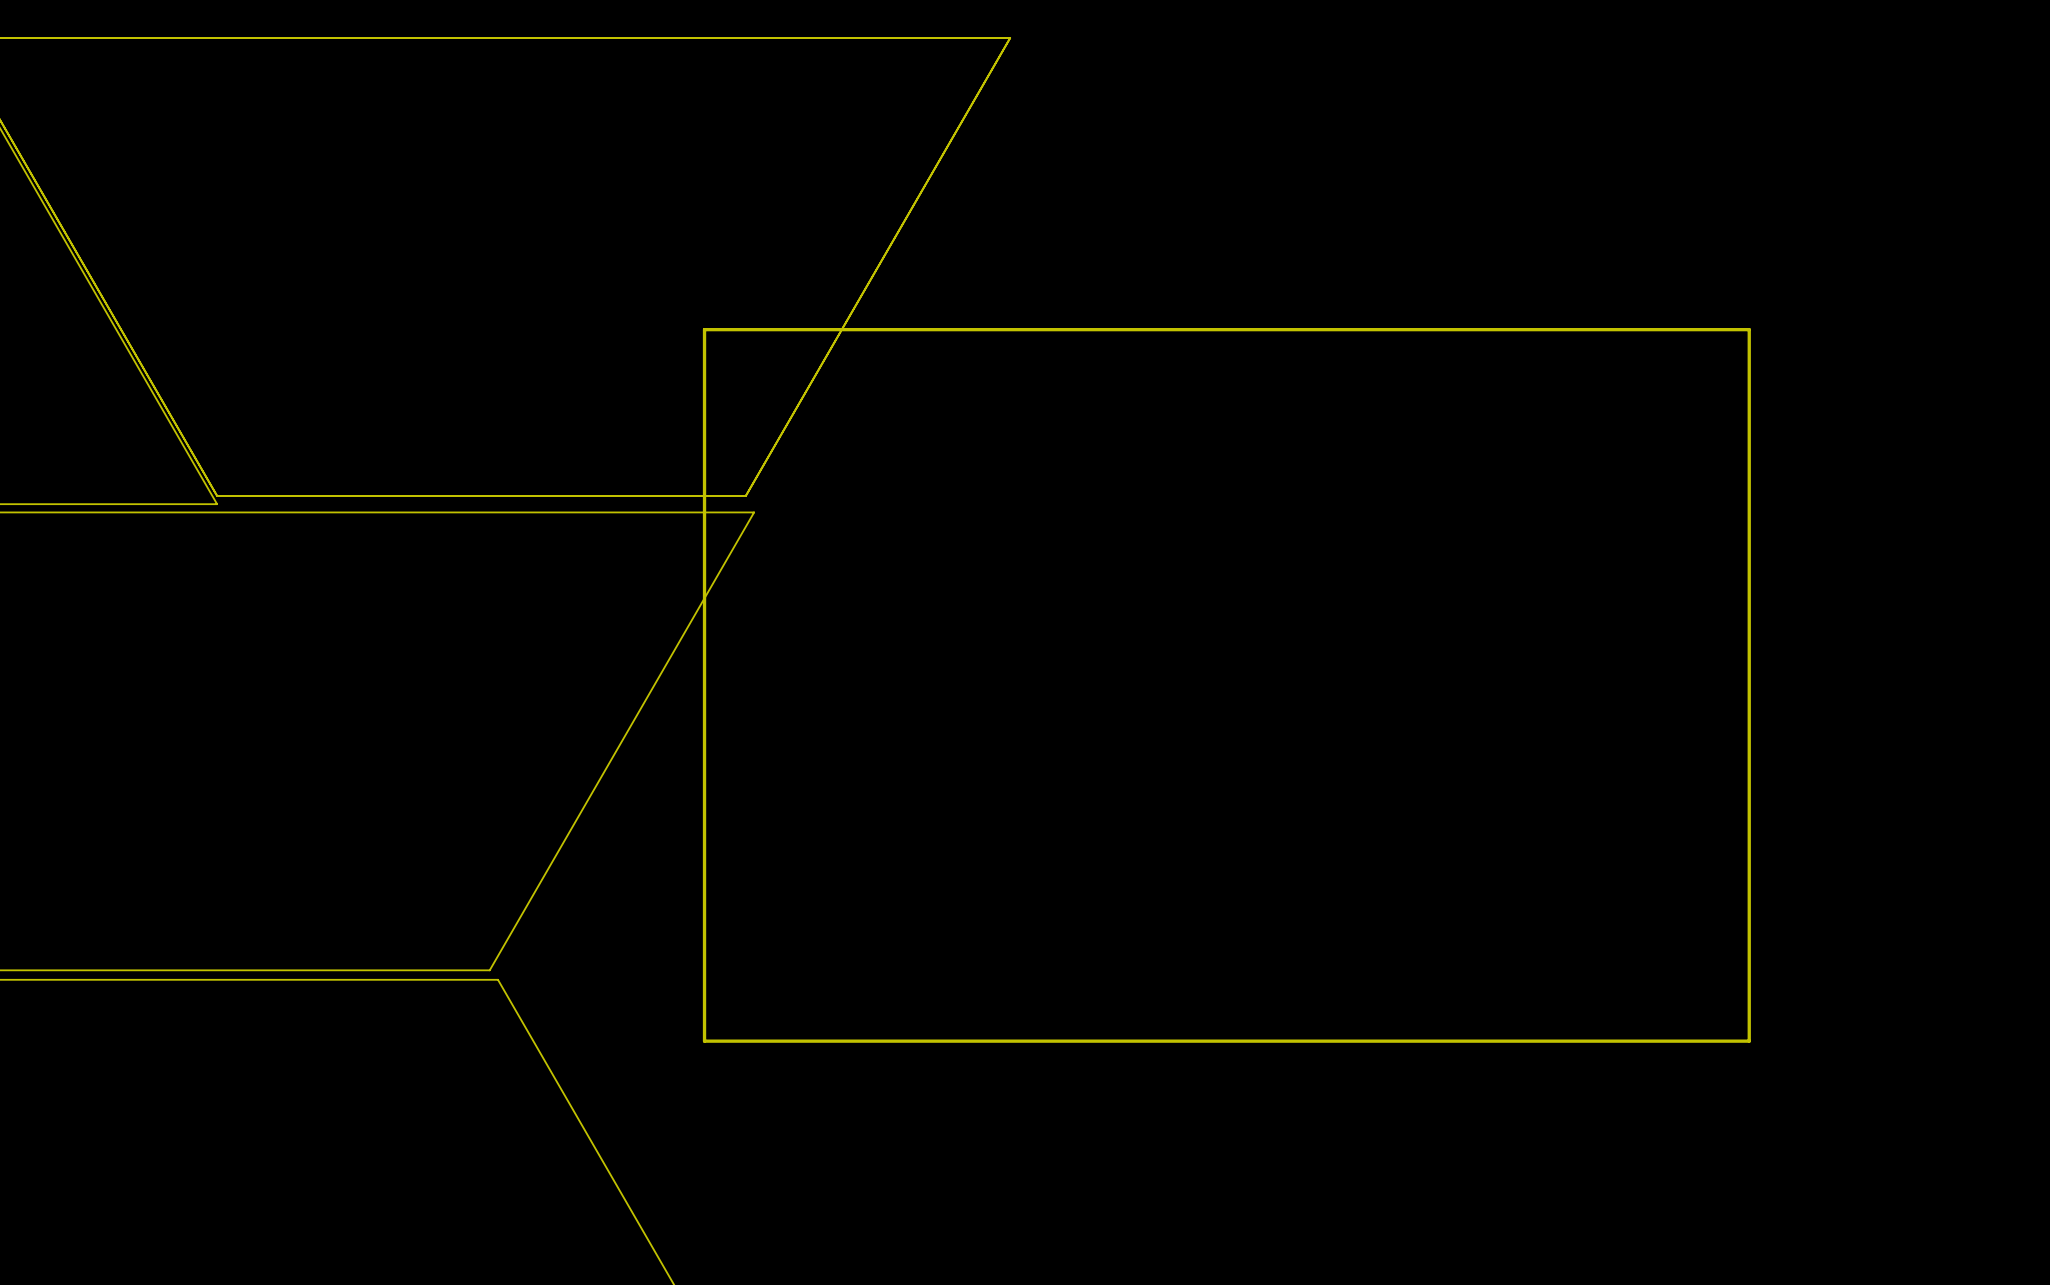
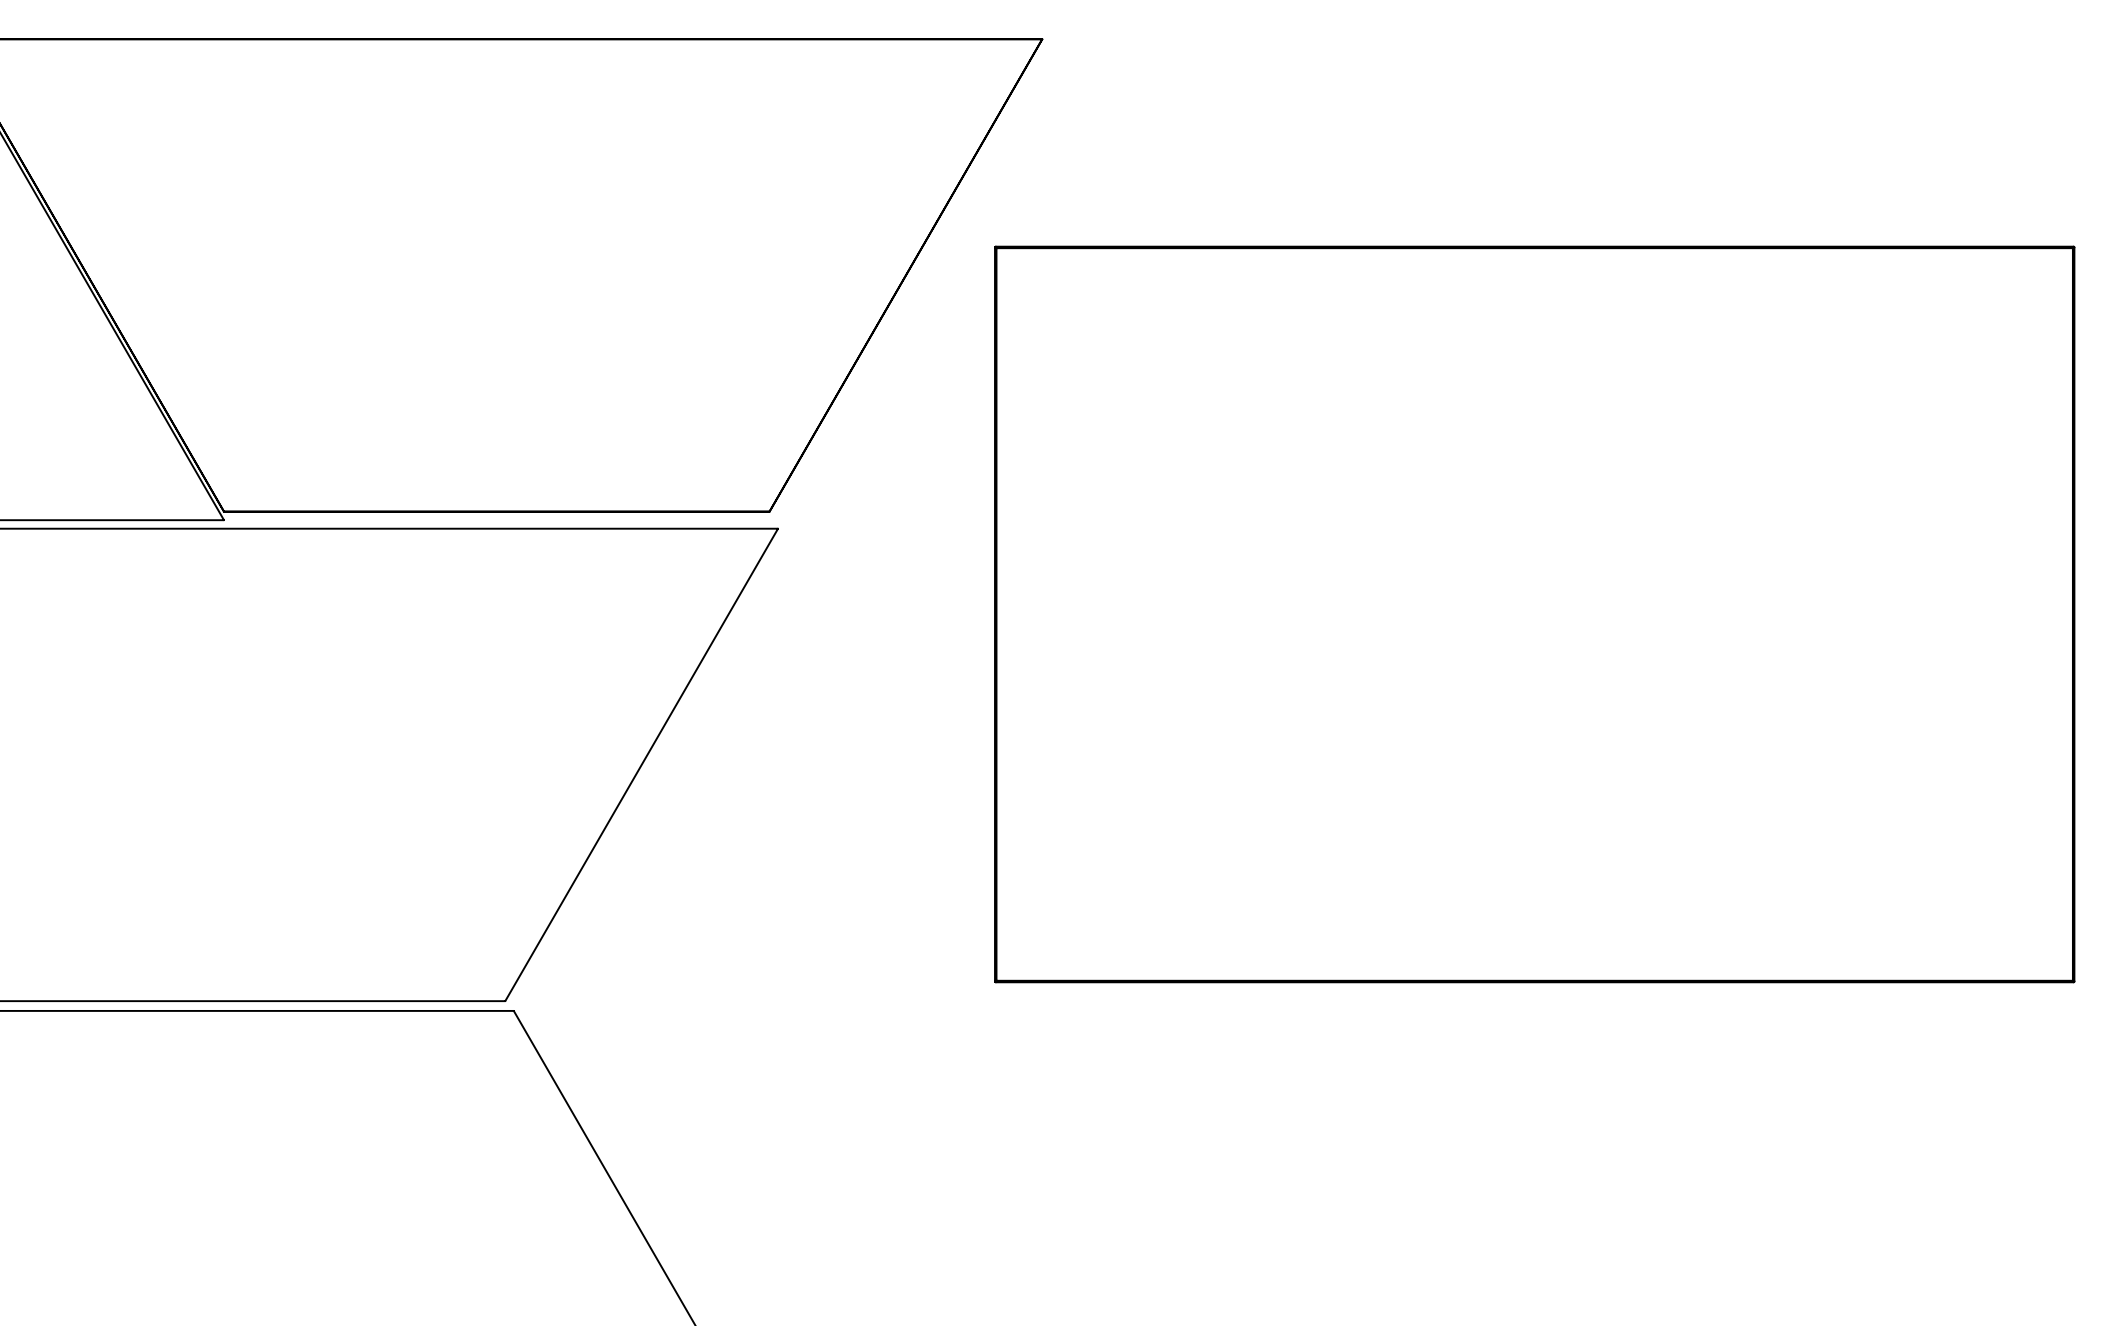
board edge: (704, 329) (1749, 329) (1749, 1041) (704, 1041) (704, 329) -> (995, 247) (2073, 247) (2073, 981) (995, 981) (995, 247)

